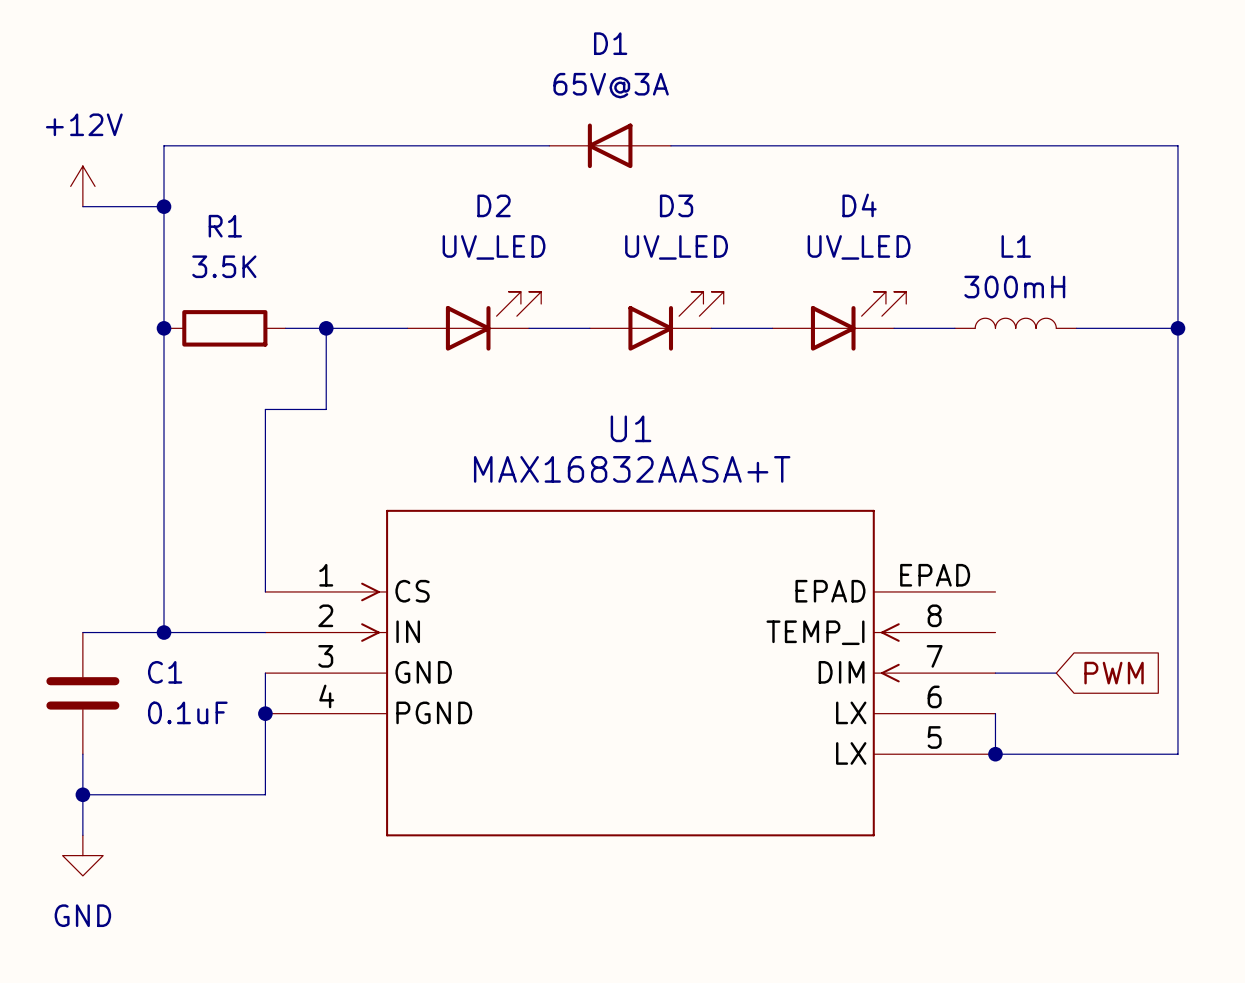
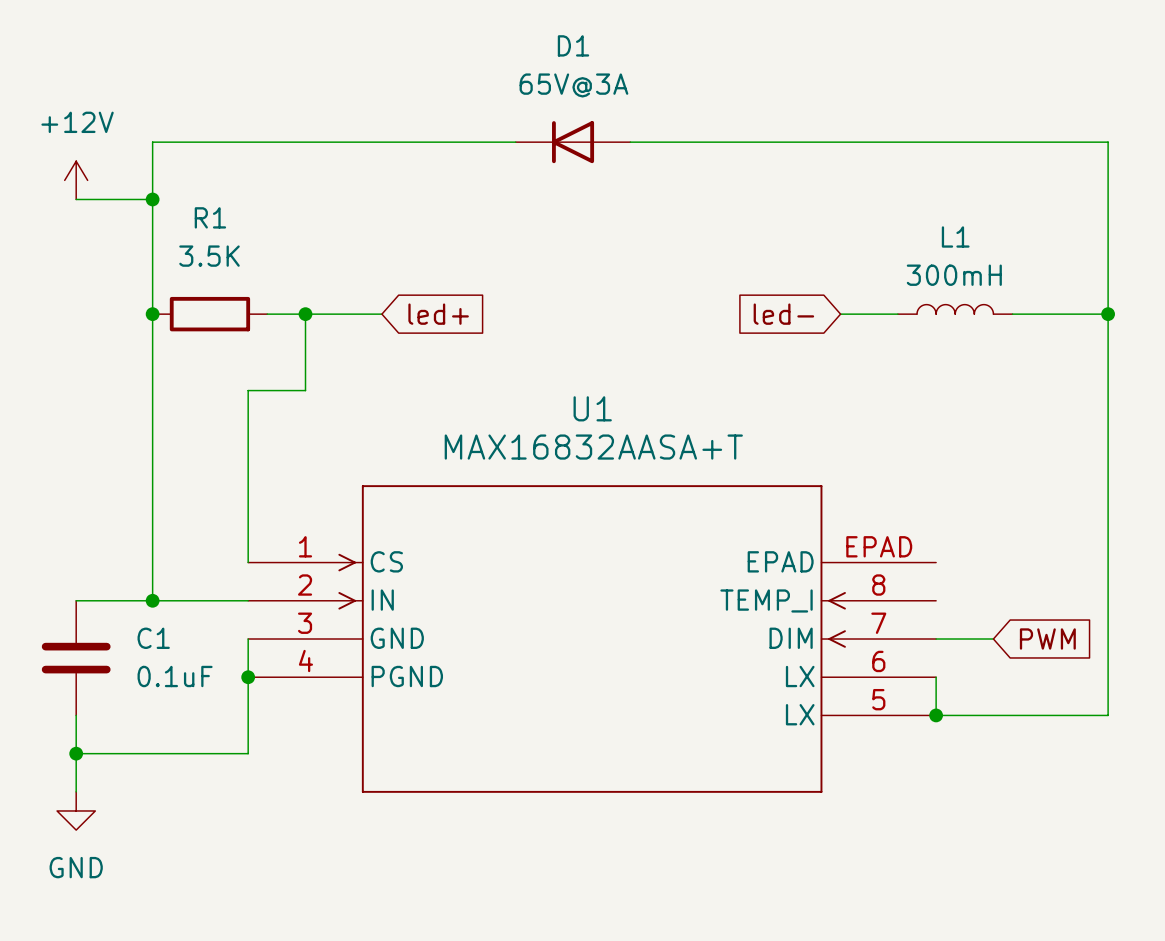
D2: UV_LED (474, 321) -> none
D3: UV_LED (656, 321) -> none
D4: UV_LED (839, 321) -> none
global label: none -> led+ (438, 314)
wire: (529, 328) (589, 328) -> none
wire: (711, 328) (772, 328) -> none
global label: none -> led- (783, 314)

